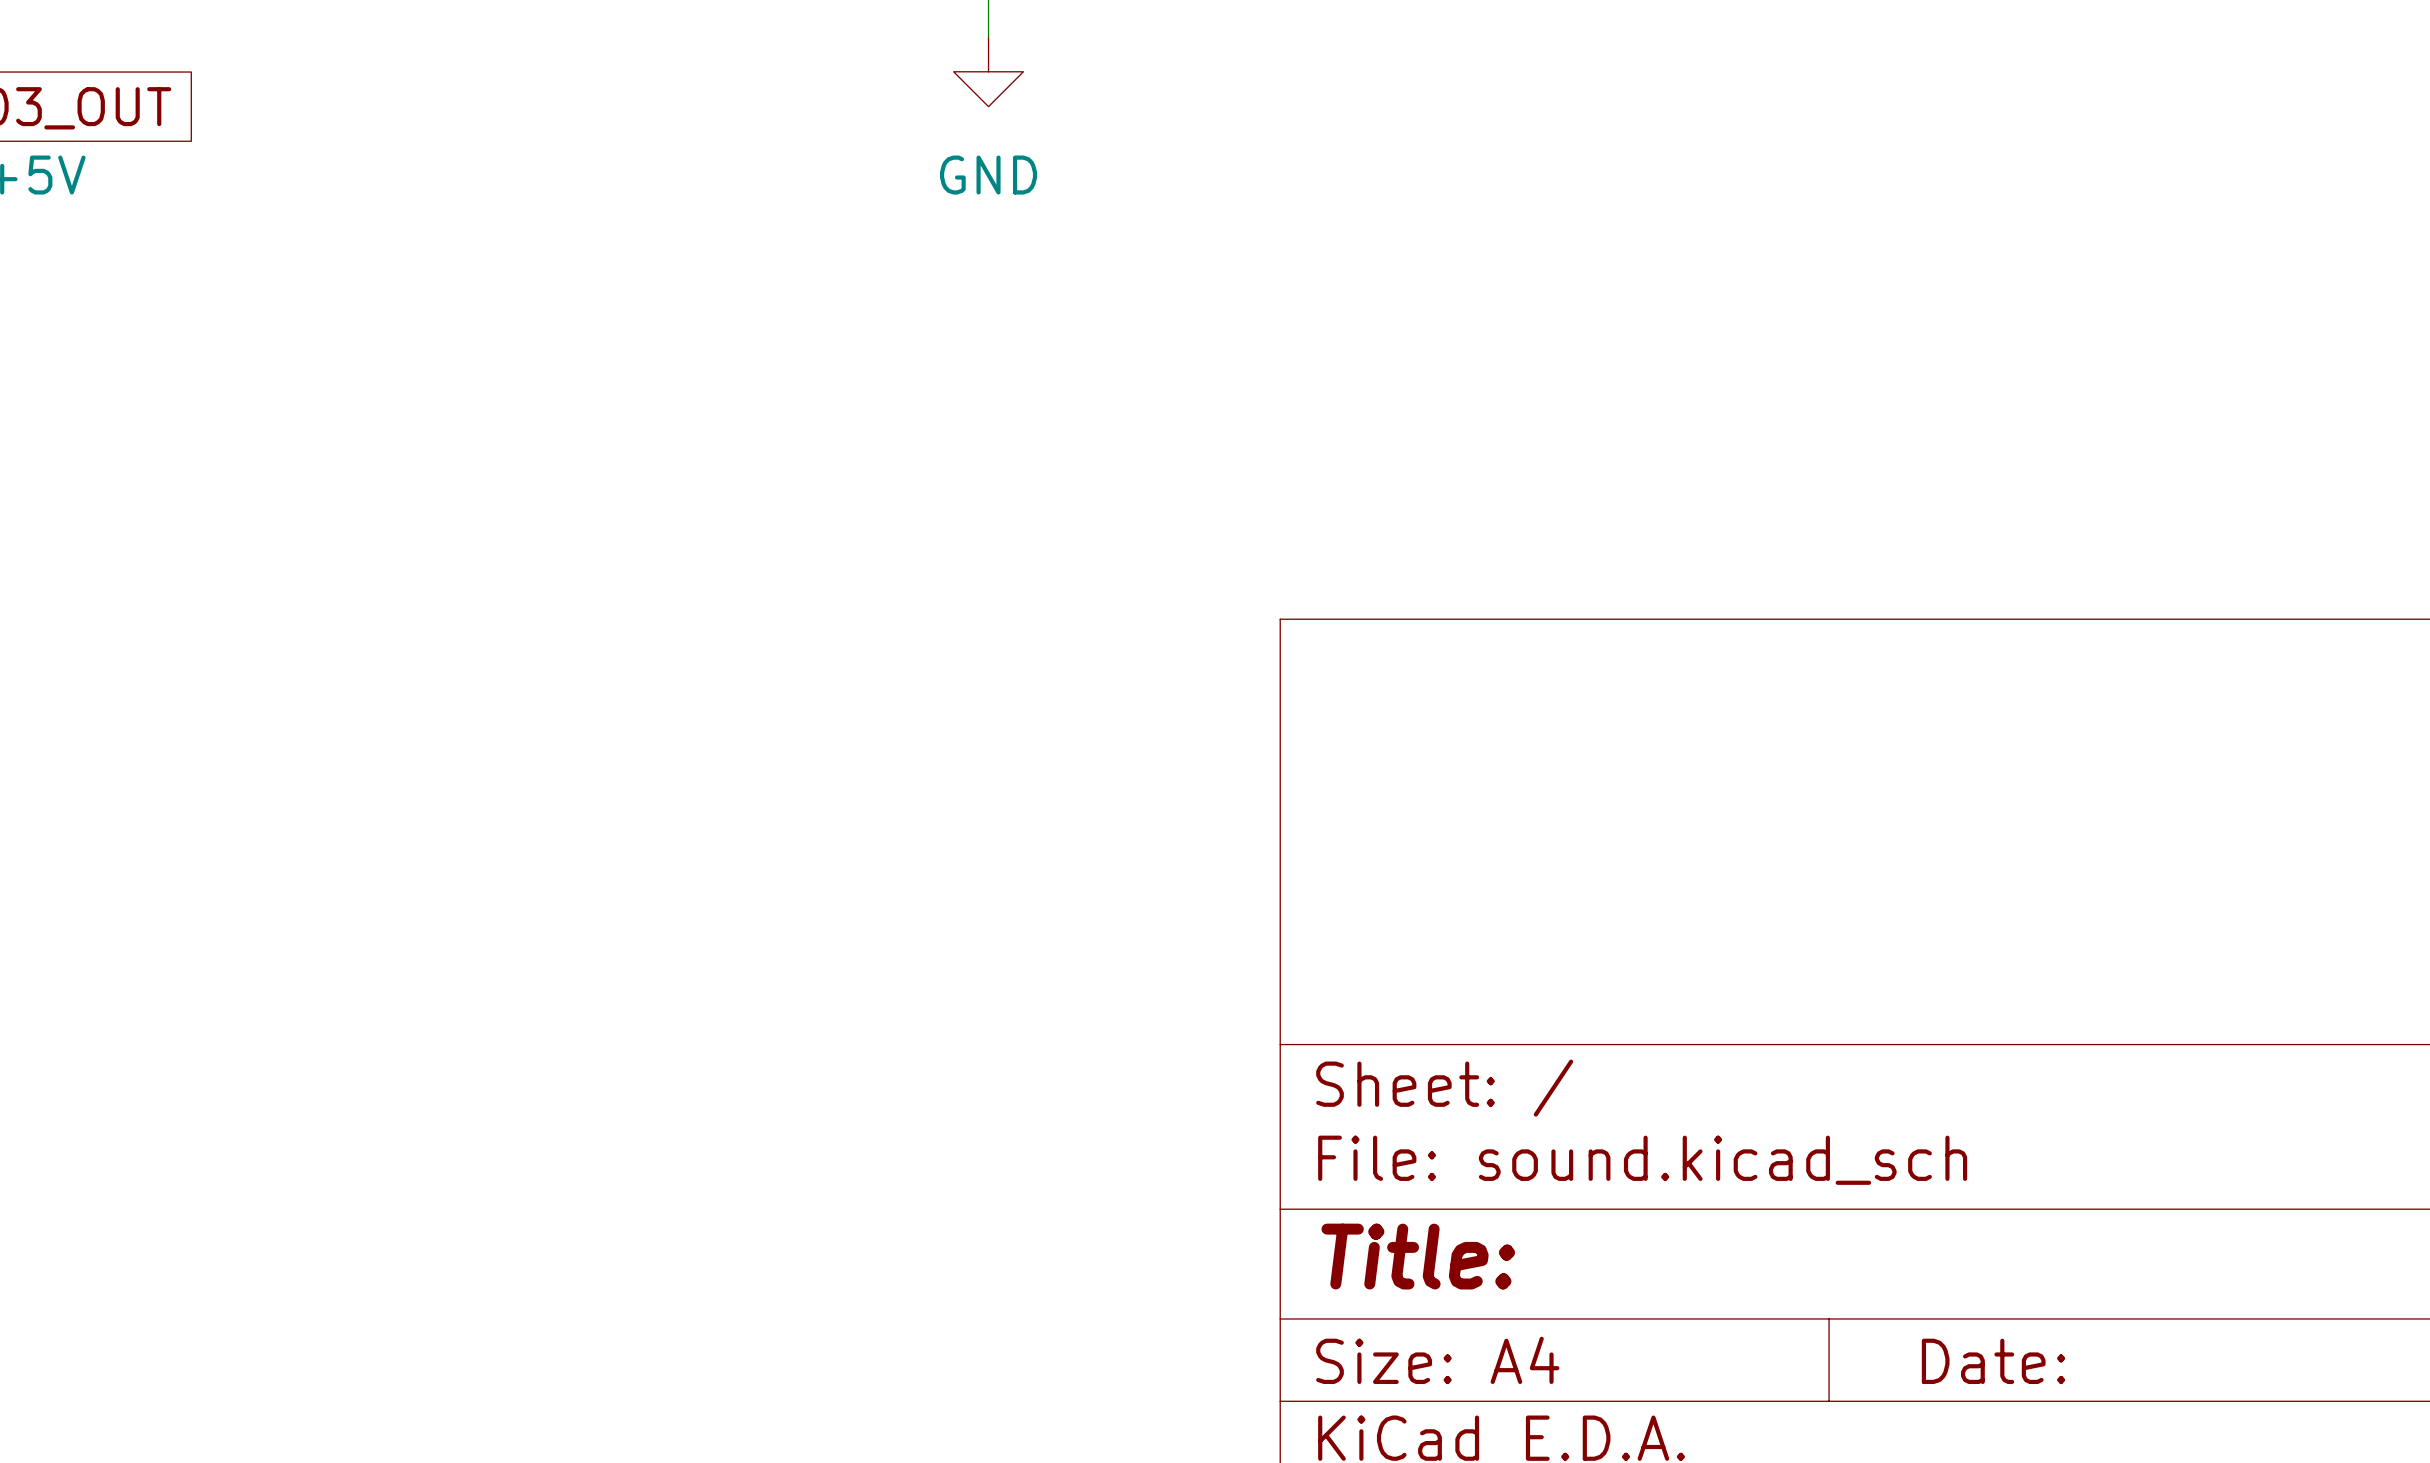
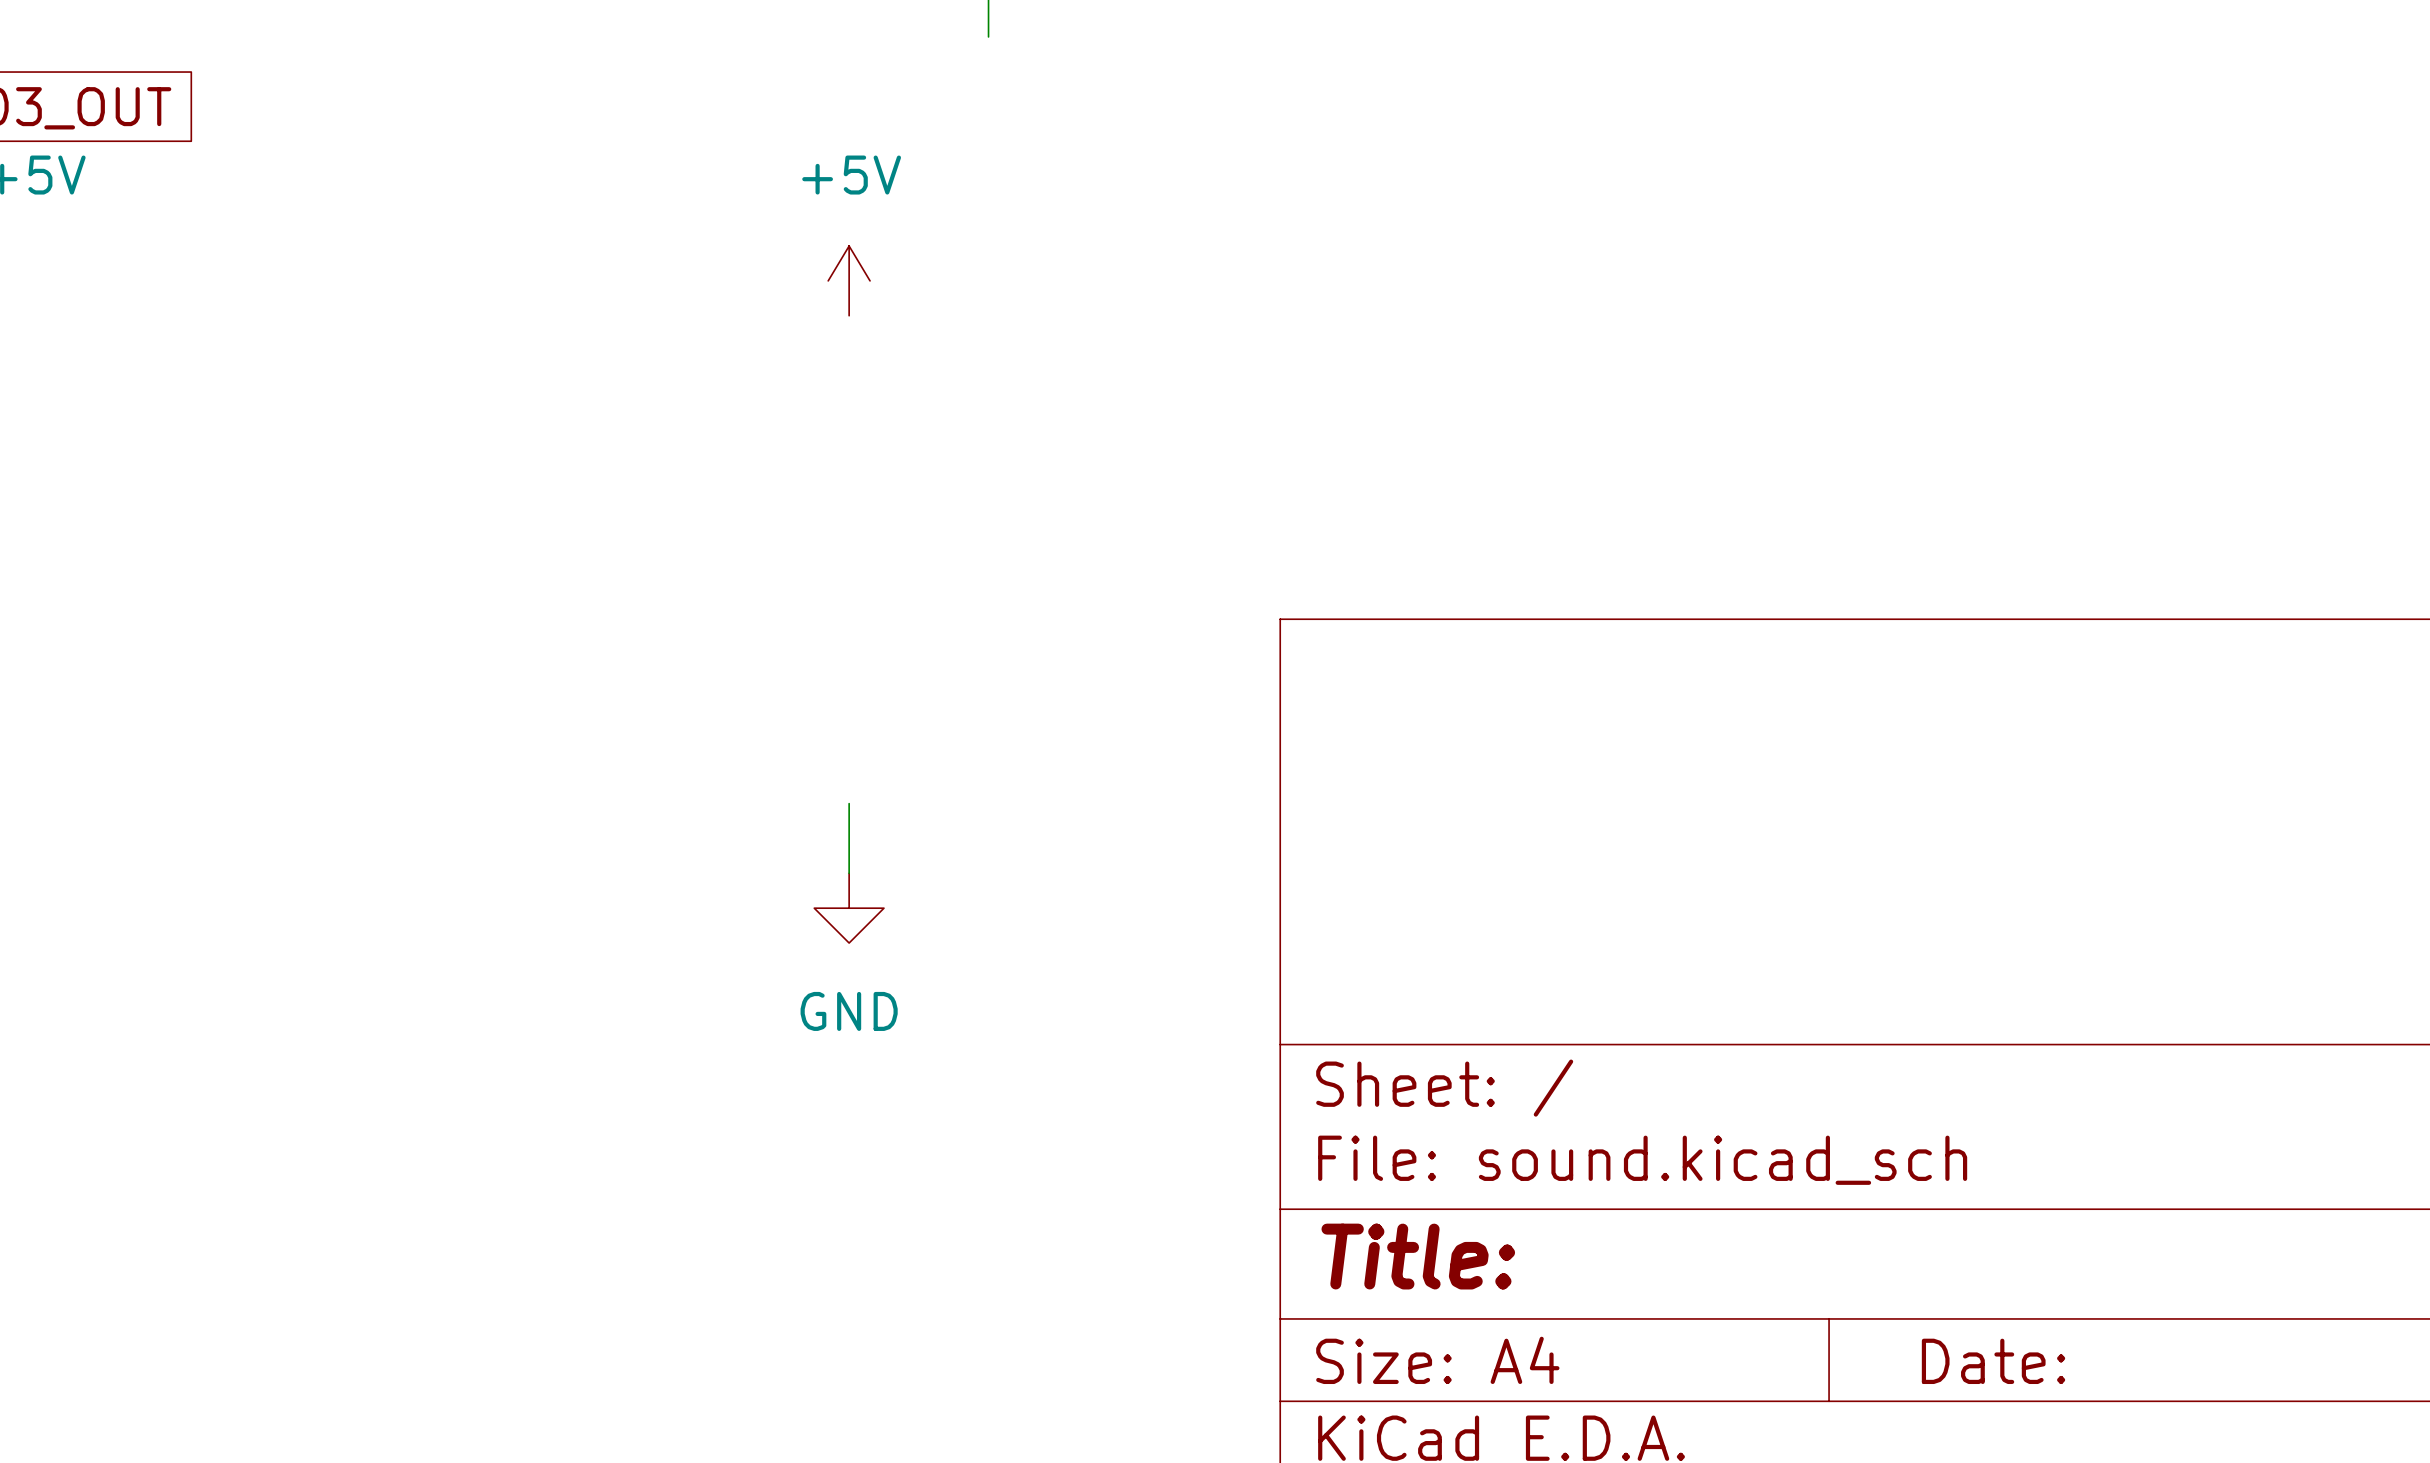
power symbol: GND (988, 71) -> none
power symbol: none -> +5V (849, 280)
wire: none -> (849, 803) (849, 873)
power symbol: none -> GND (849, 908)

